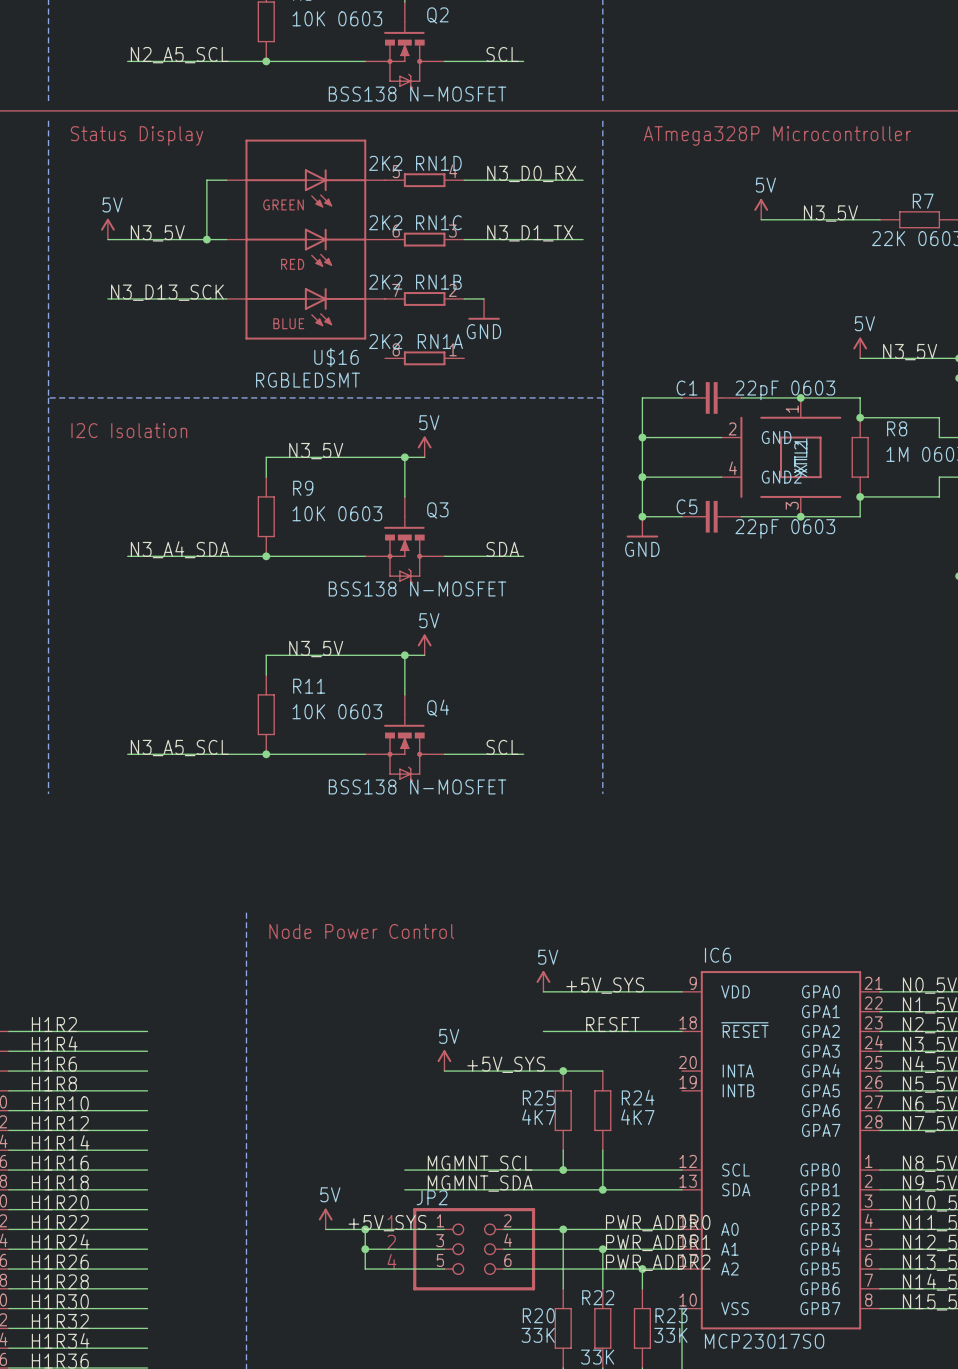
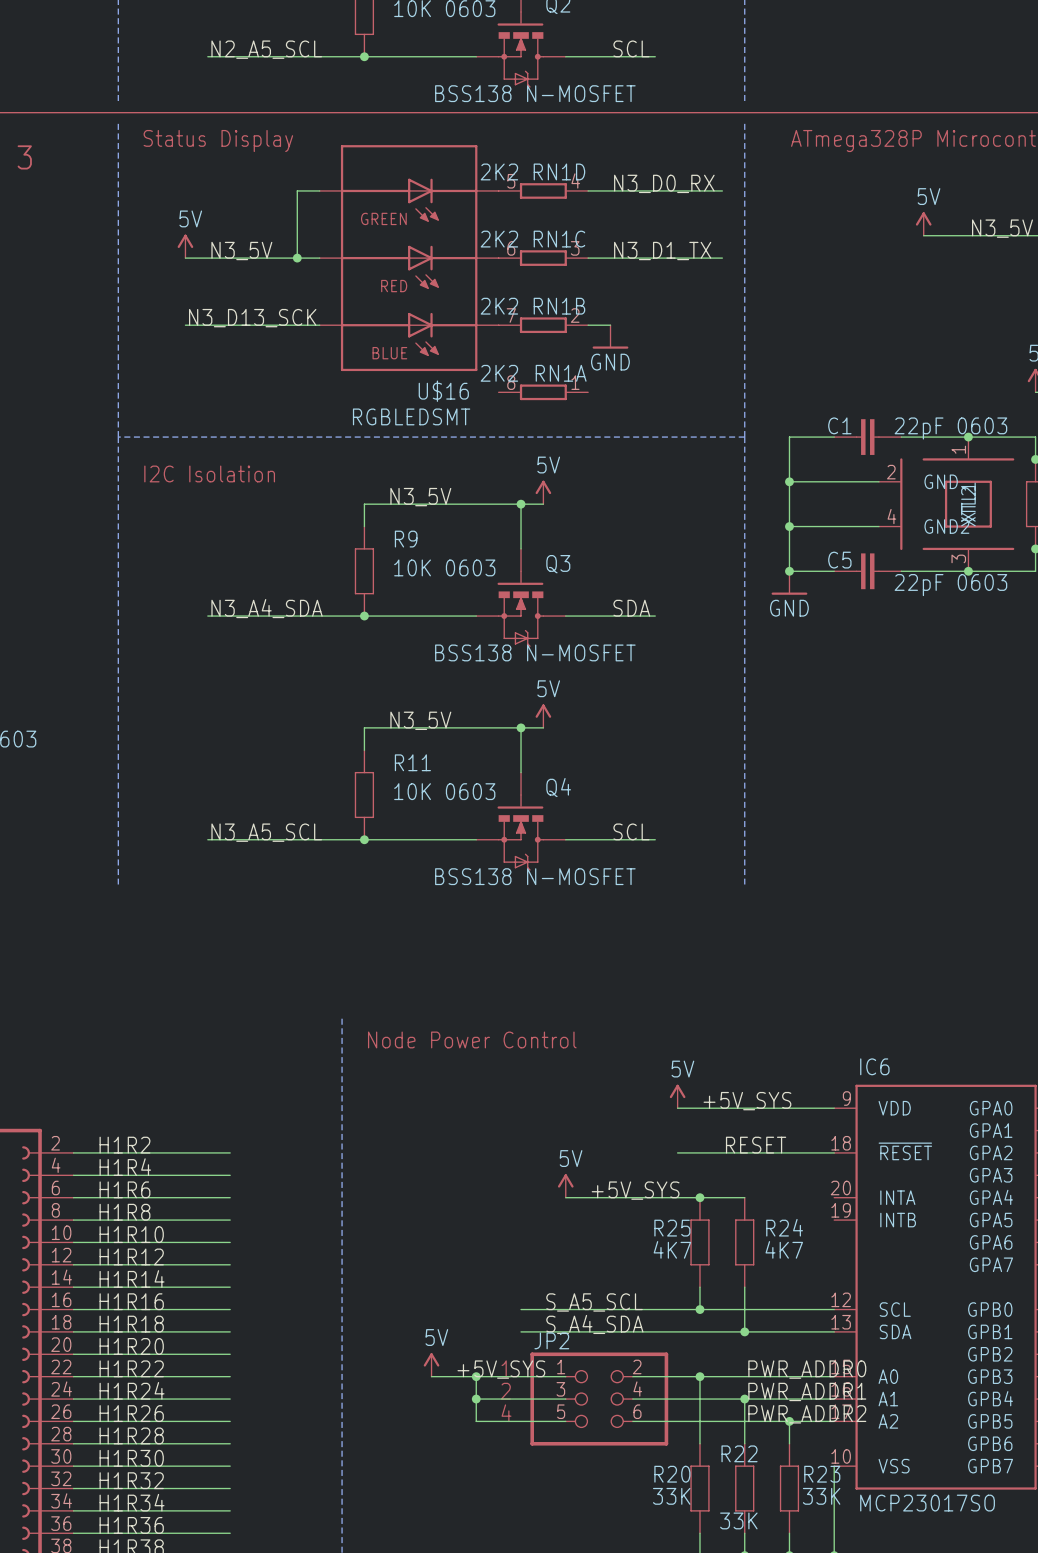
label: MGMNT_SCL (480, 1163) -> S_A5_SCL (594, 1302)
label: MGMNT_SDA (480, 1183) -> S_A4_SDA (594, 1324)

